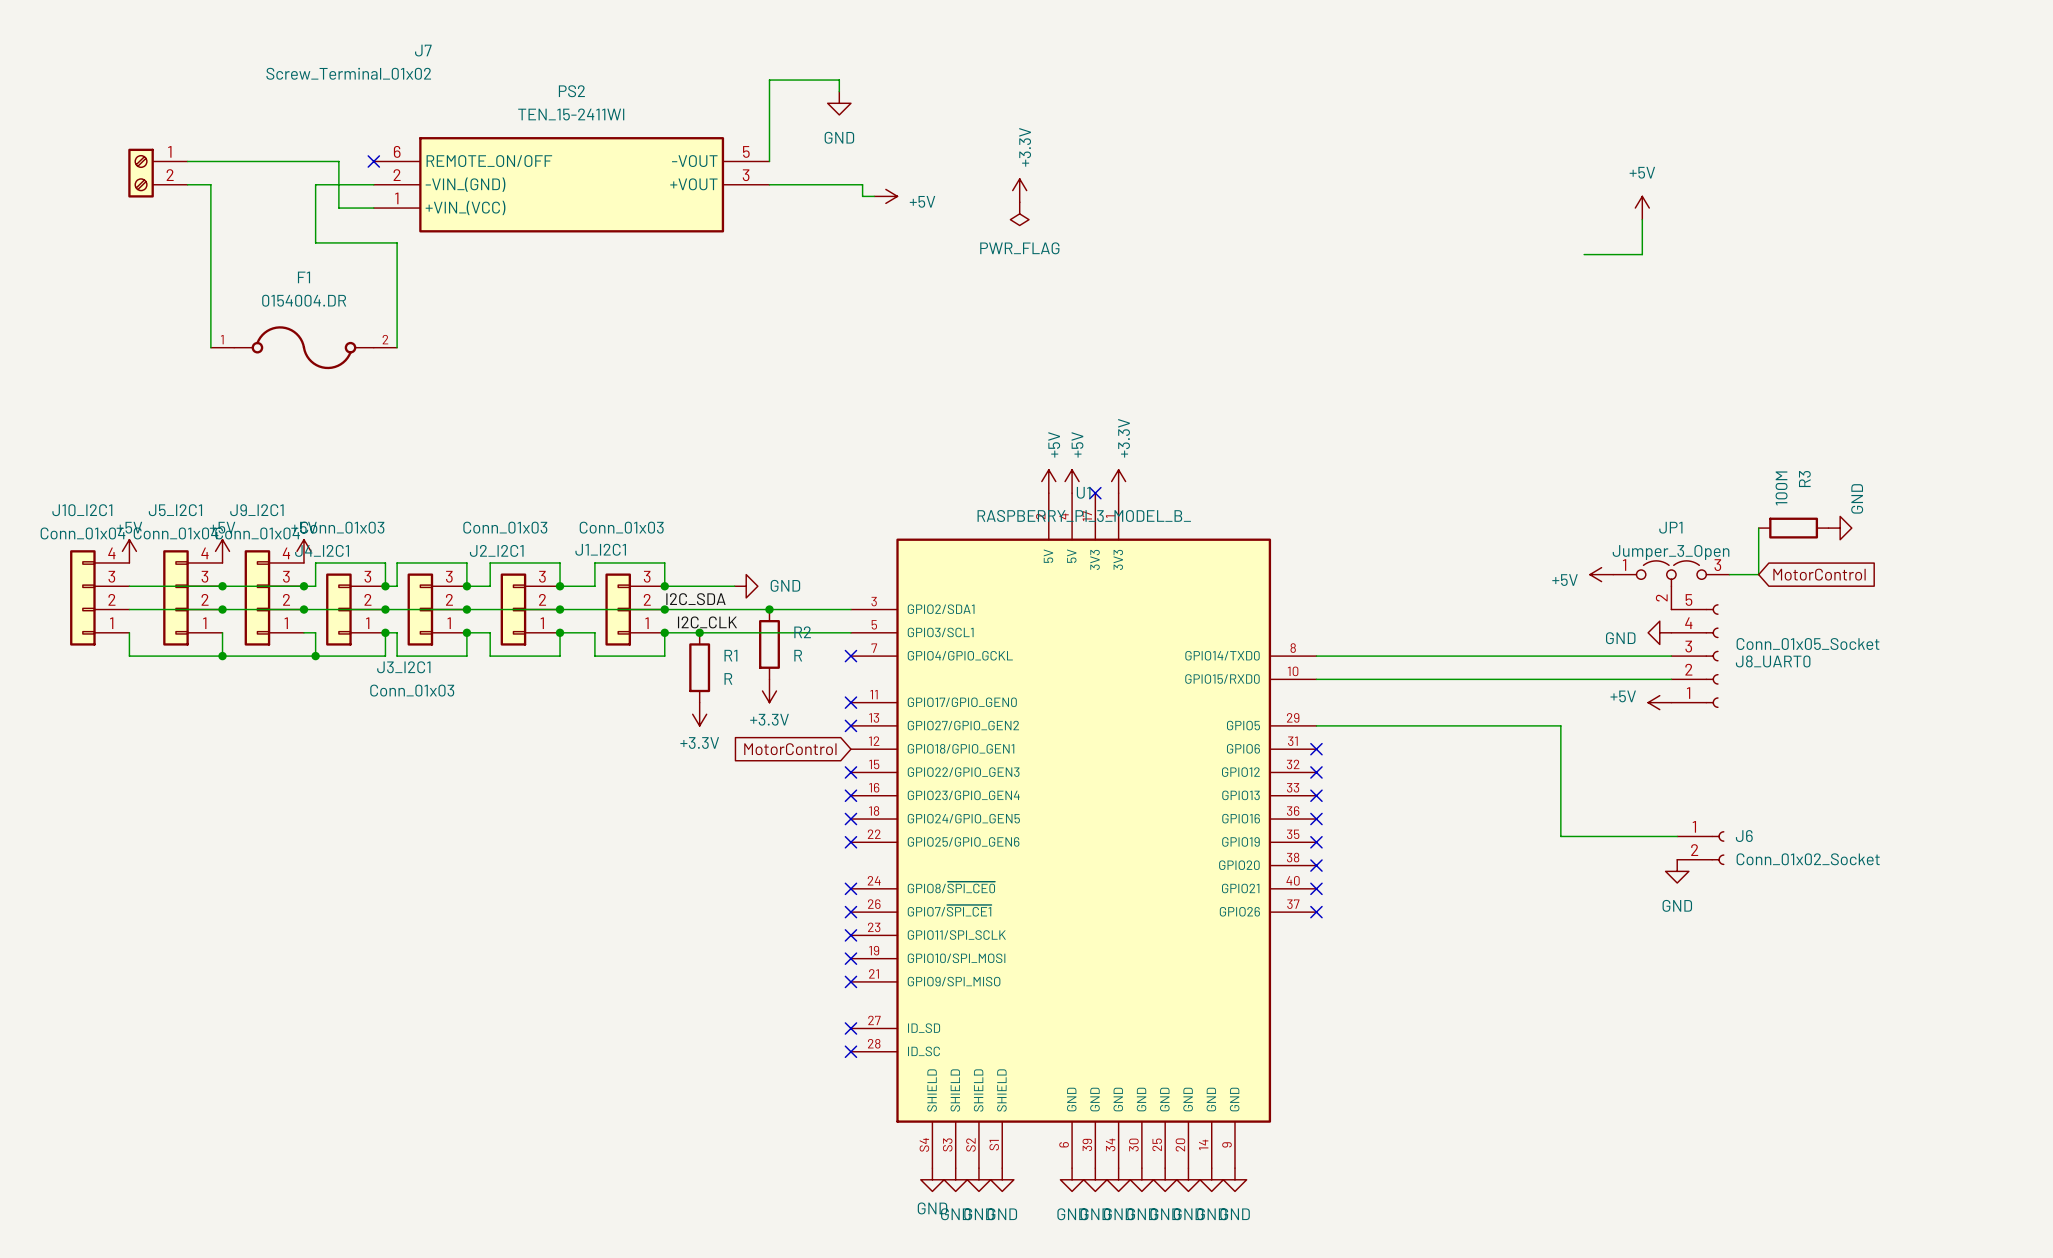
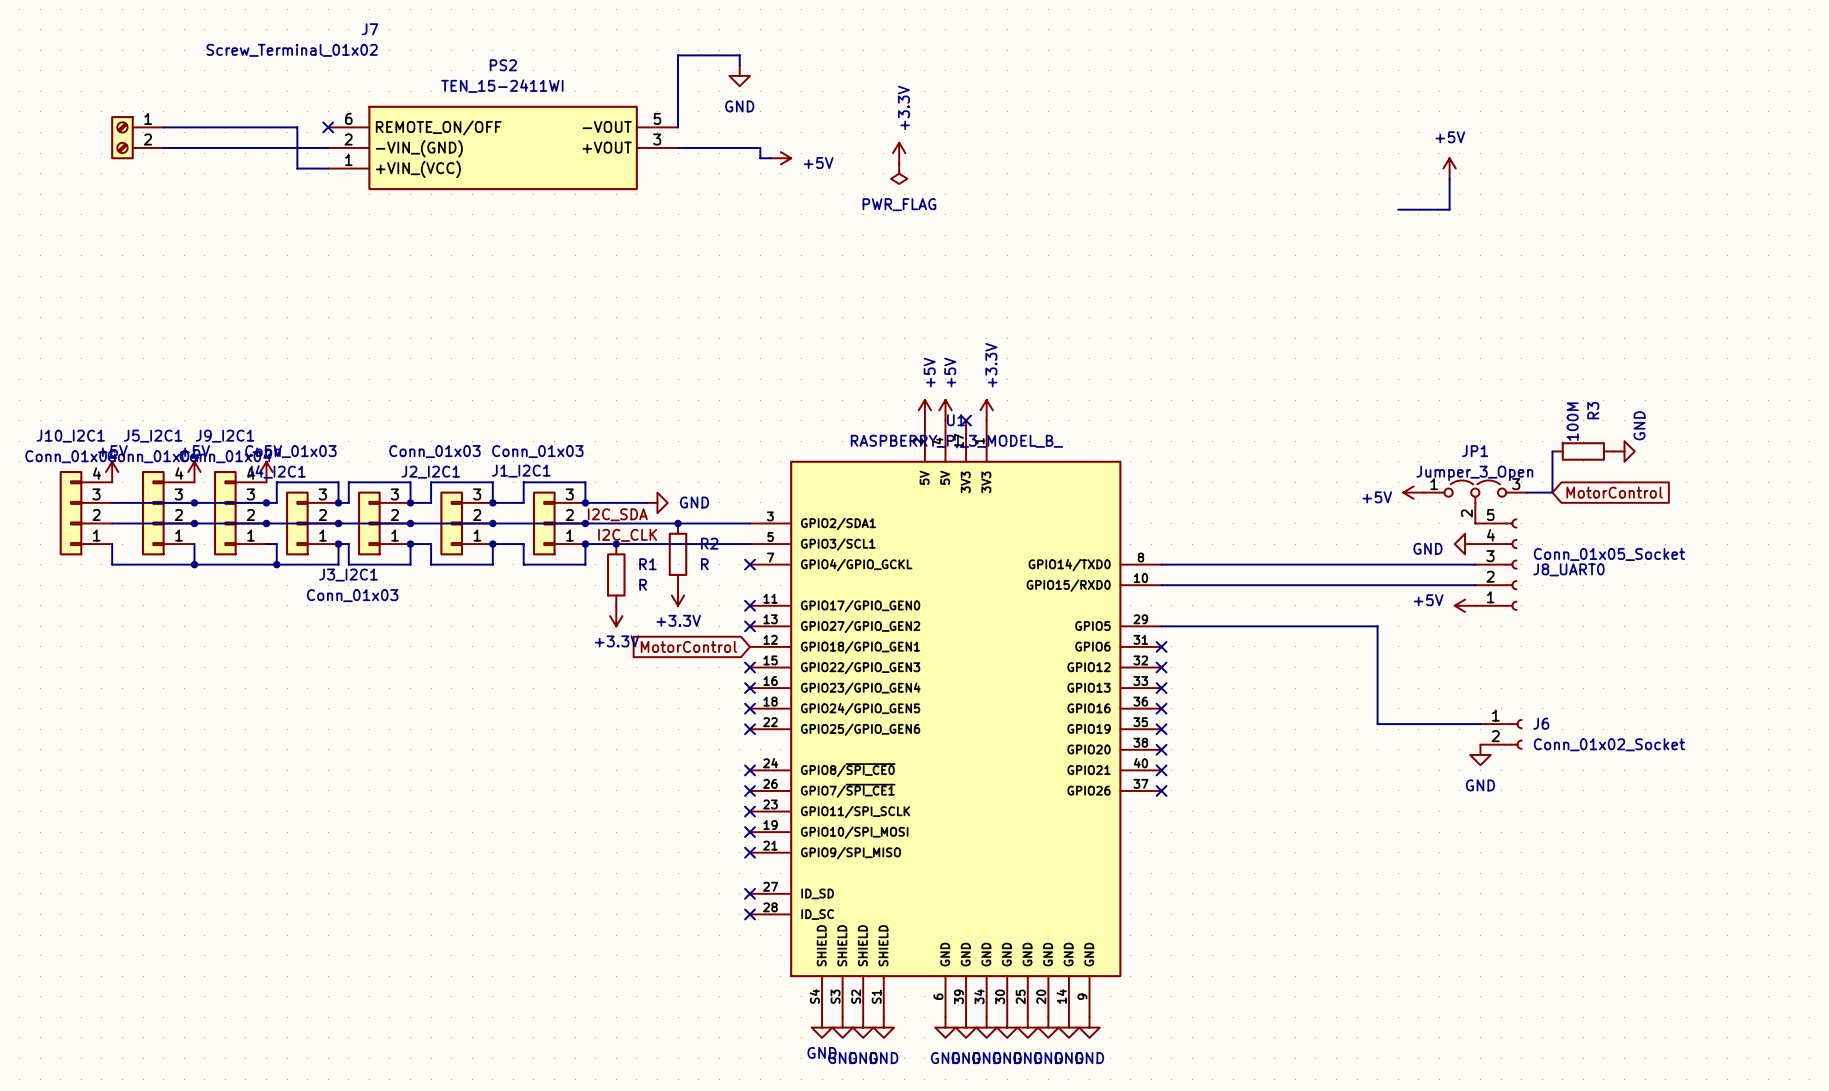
wire: (210, 184) (210, 347) -> (184, 147) (276, 147)
wire: (315, 184) (315, 242) (397, 242) (397, 347) -> none
F1: 0154004.DR (303, 347) -> none

